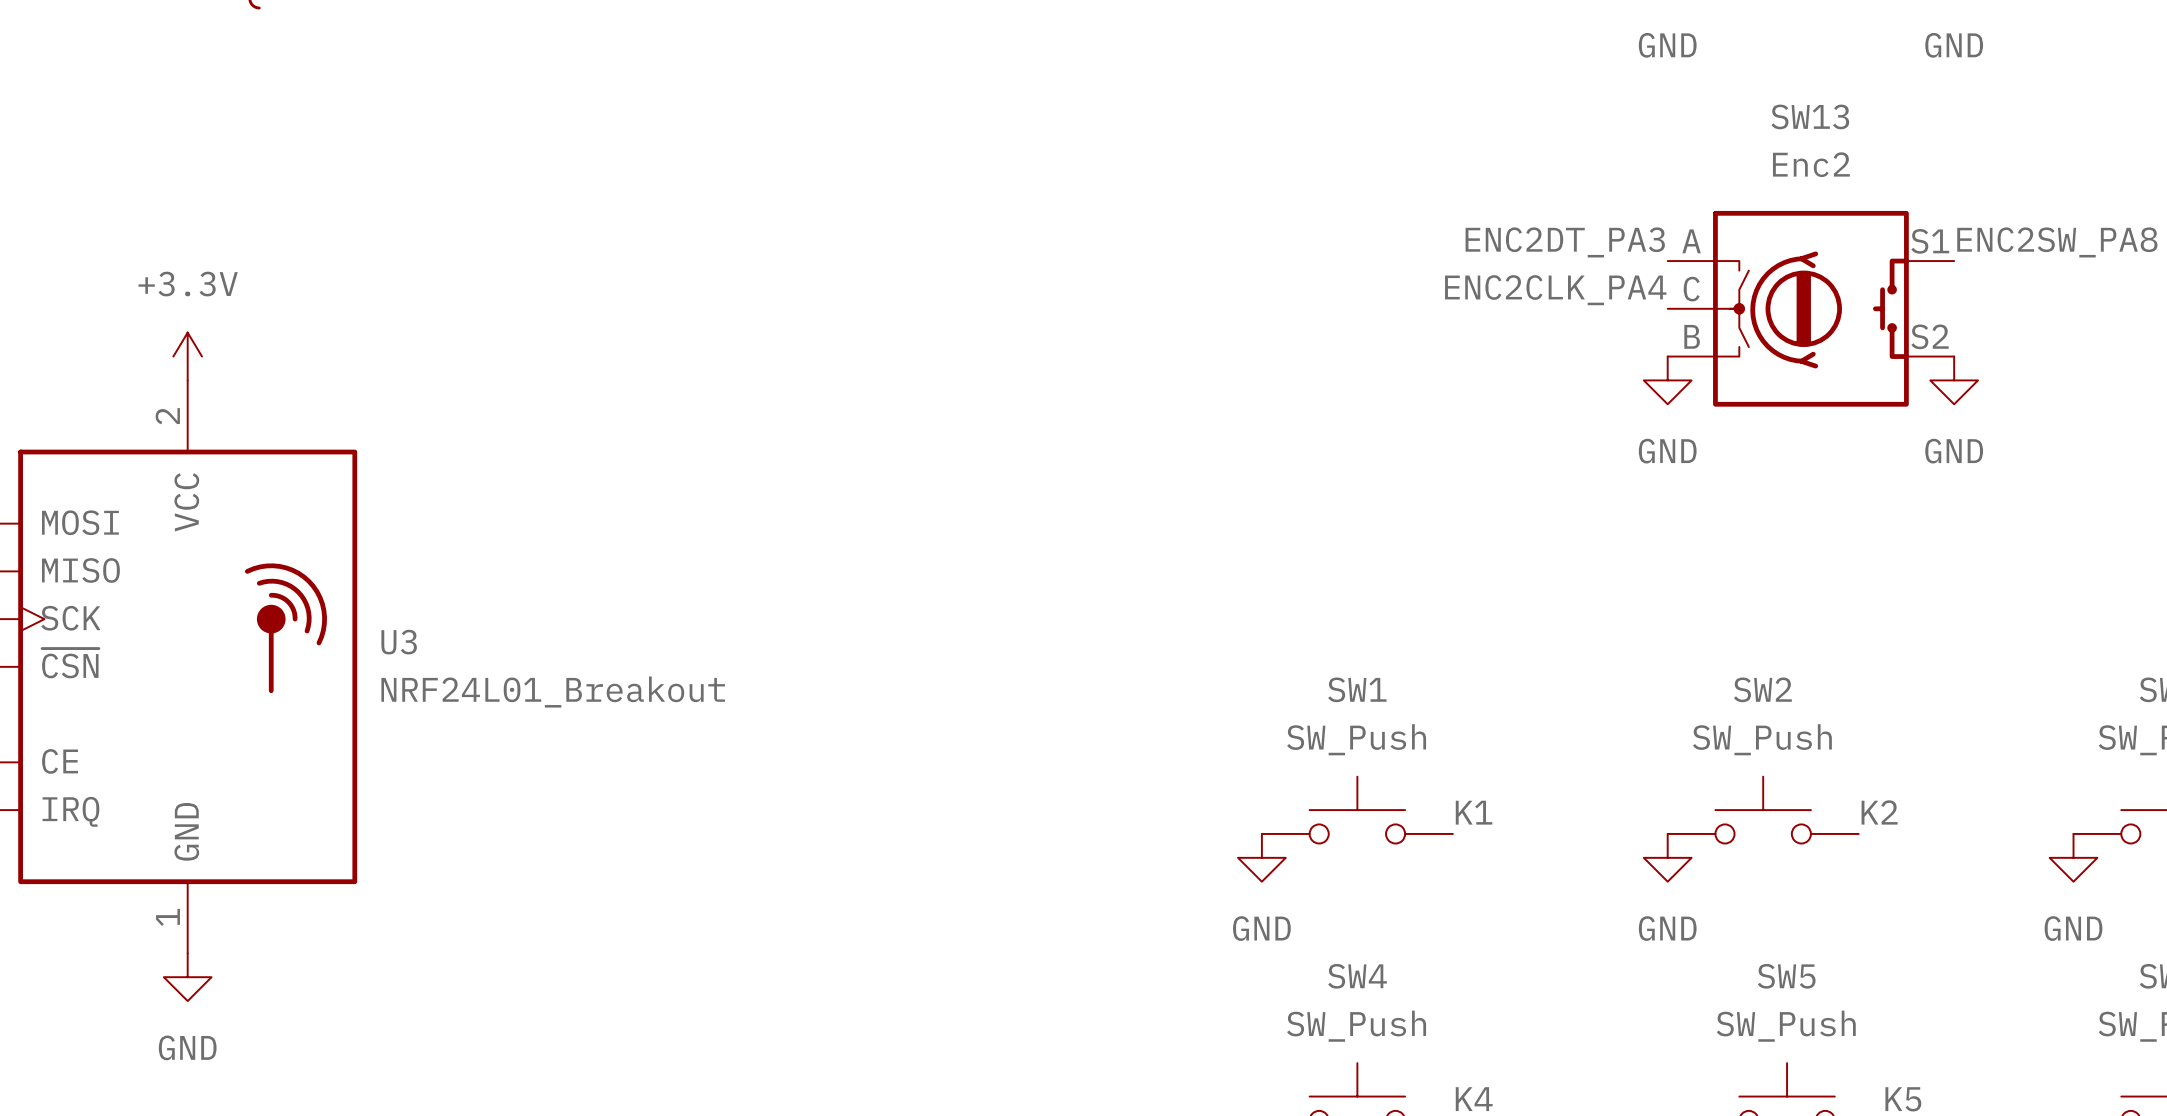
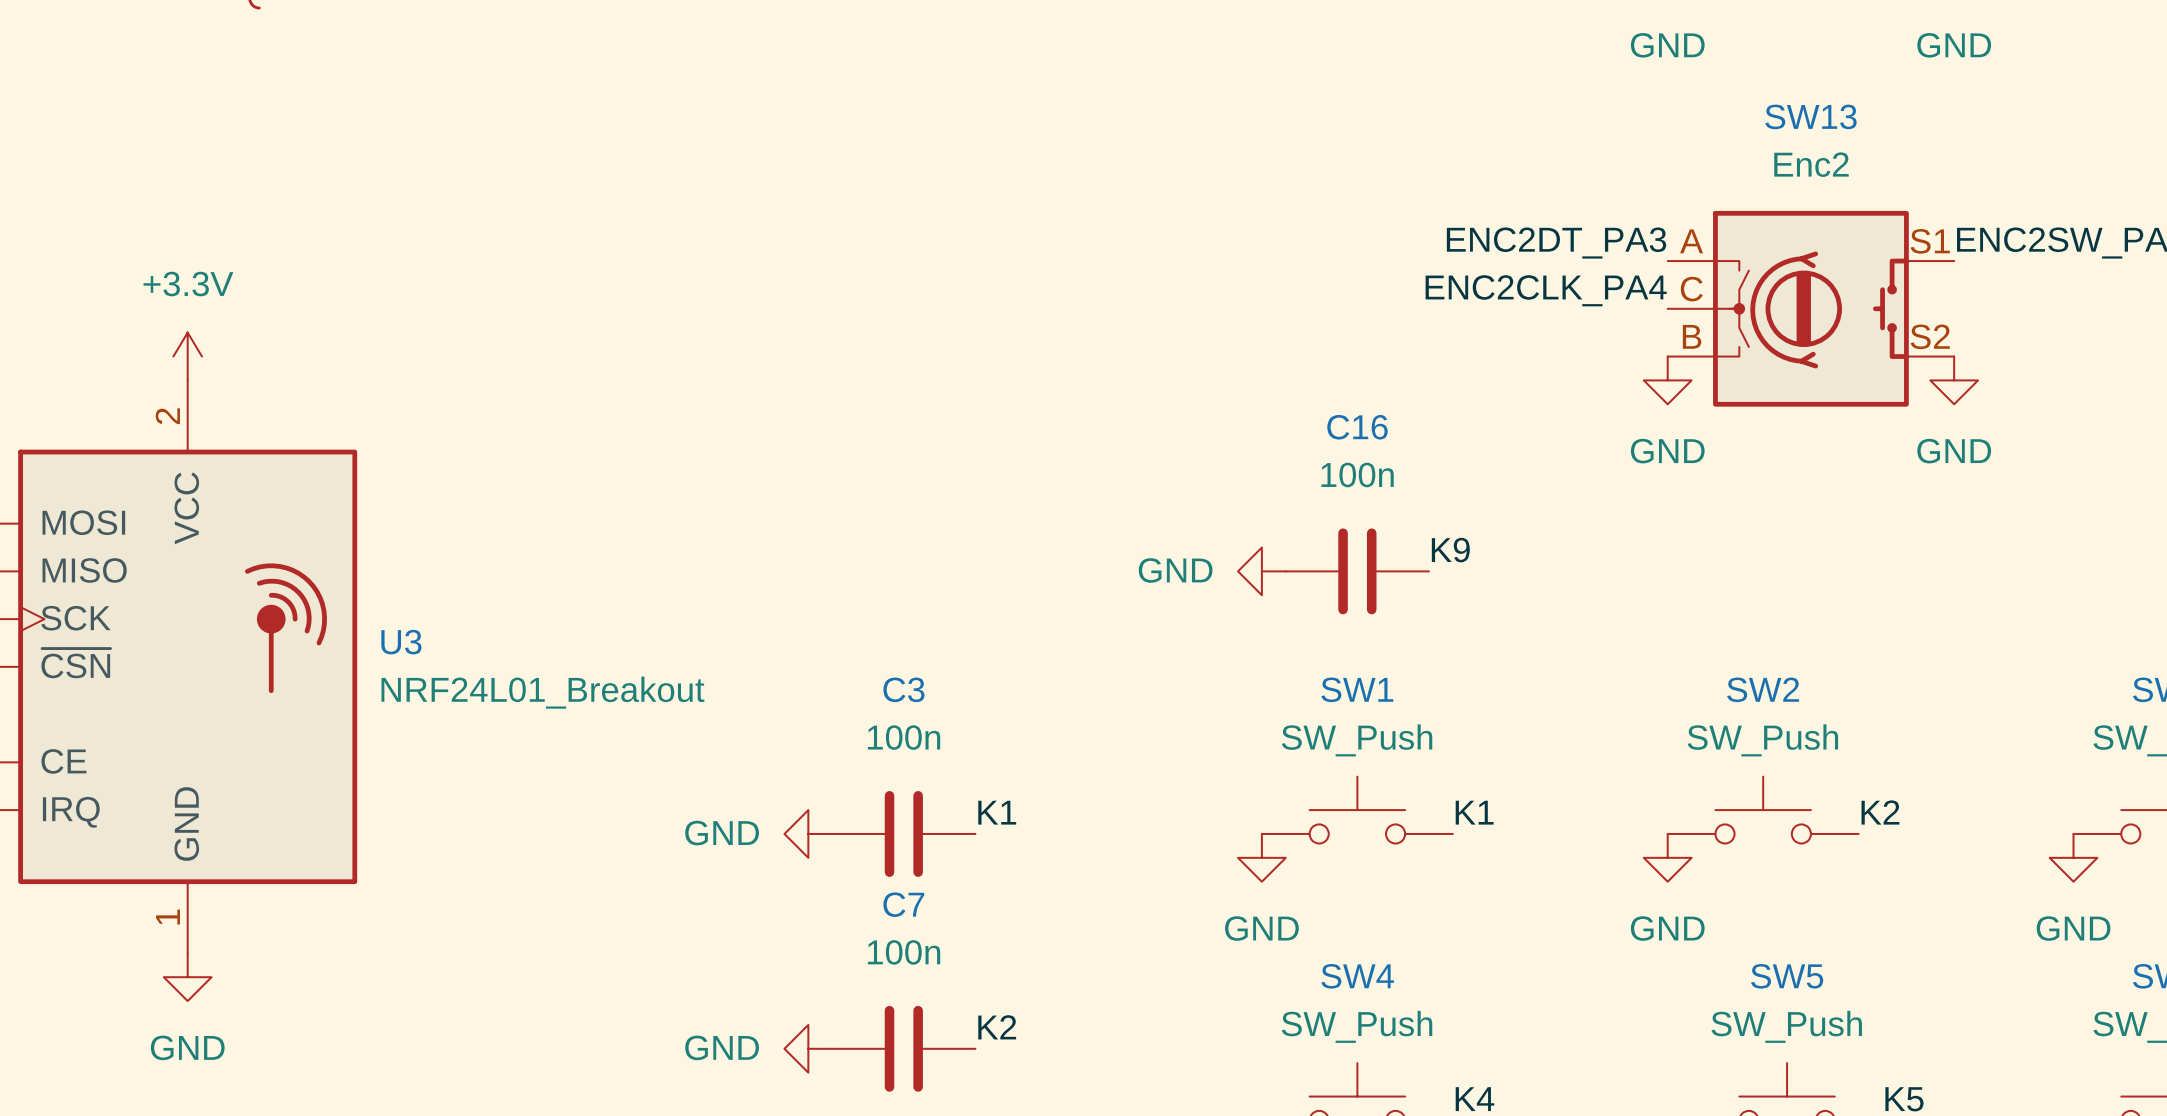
label: none -> K9 (1450, 550)
power symbol: none -> GND (1261, 571)
C16: none -> 100n (1357, 571)
label: none -> K1 (997, 812)
power symbol: none -> GND (808, 833)
C3: none -> 100n (903, 833)
label: none -> K2 (997, 1027)
power symbol: none -> GND (808, 1048)
C7: none -> 100n (903, 1048)

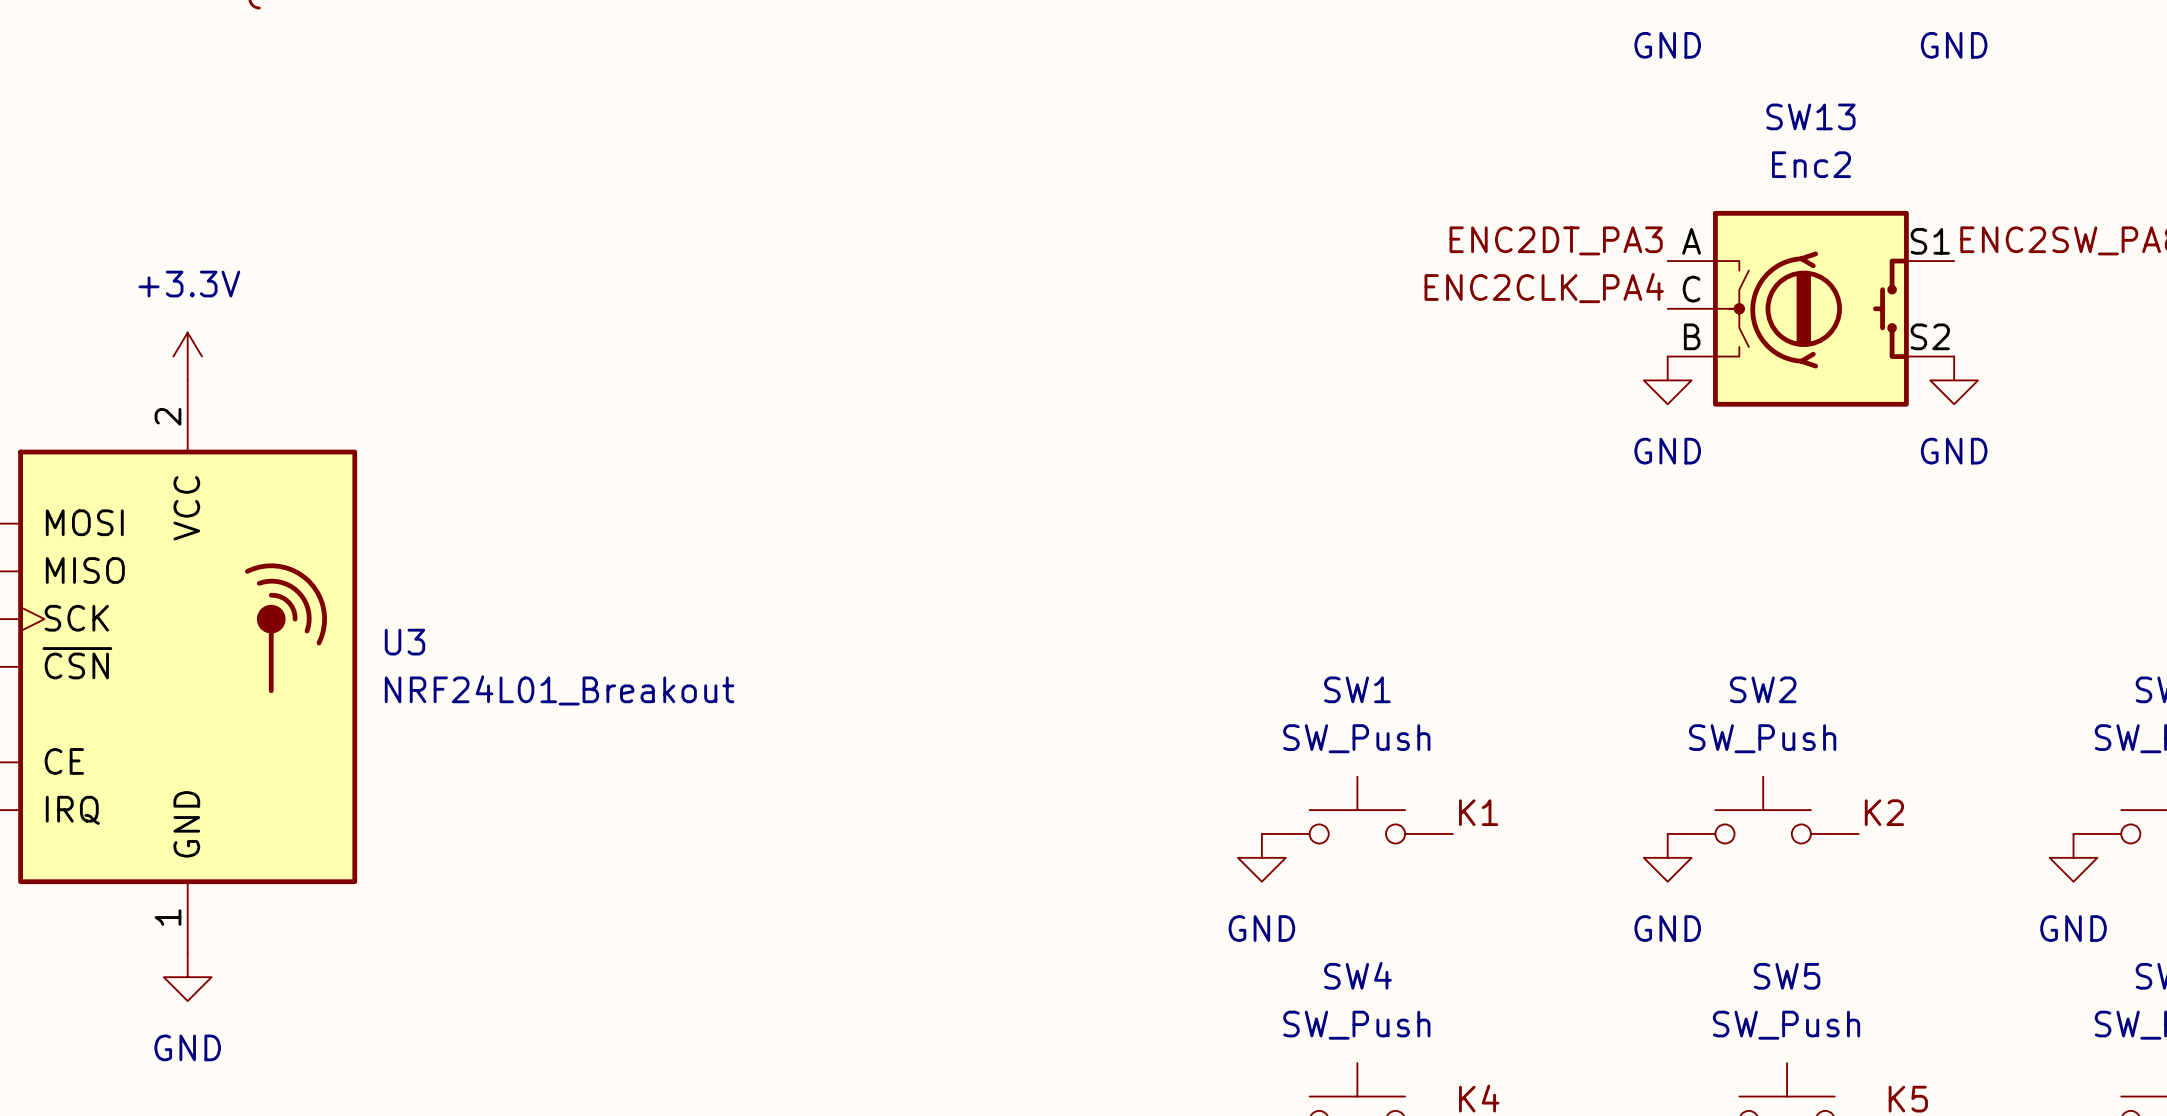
label: K9 (1450, 550) -> none
power symbol: GND (1261, 571) -> none
C16: 100n (1357, 571) -> none
label: K1 (997, 812) -> none
power symbol: GND (808, 833) -> none
C3: 100n (903, 833) -> none
label: K2 (997, 1027) -> none
power symbol: GND (808, 1048) -> none
C7: 100n (903, 1048) -> none

